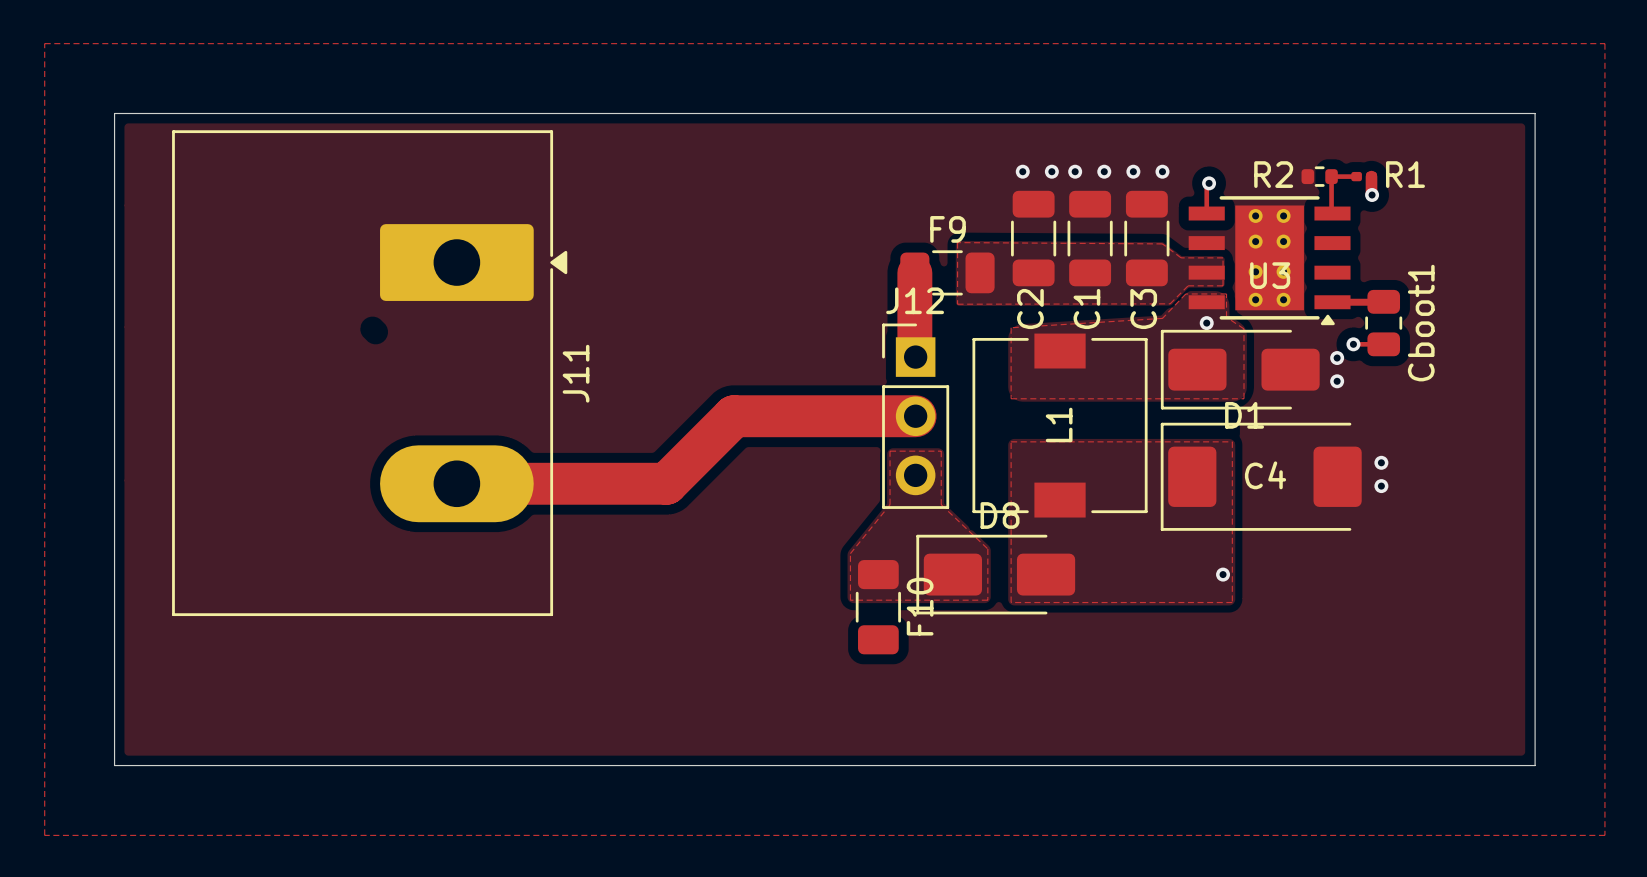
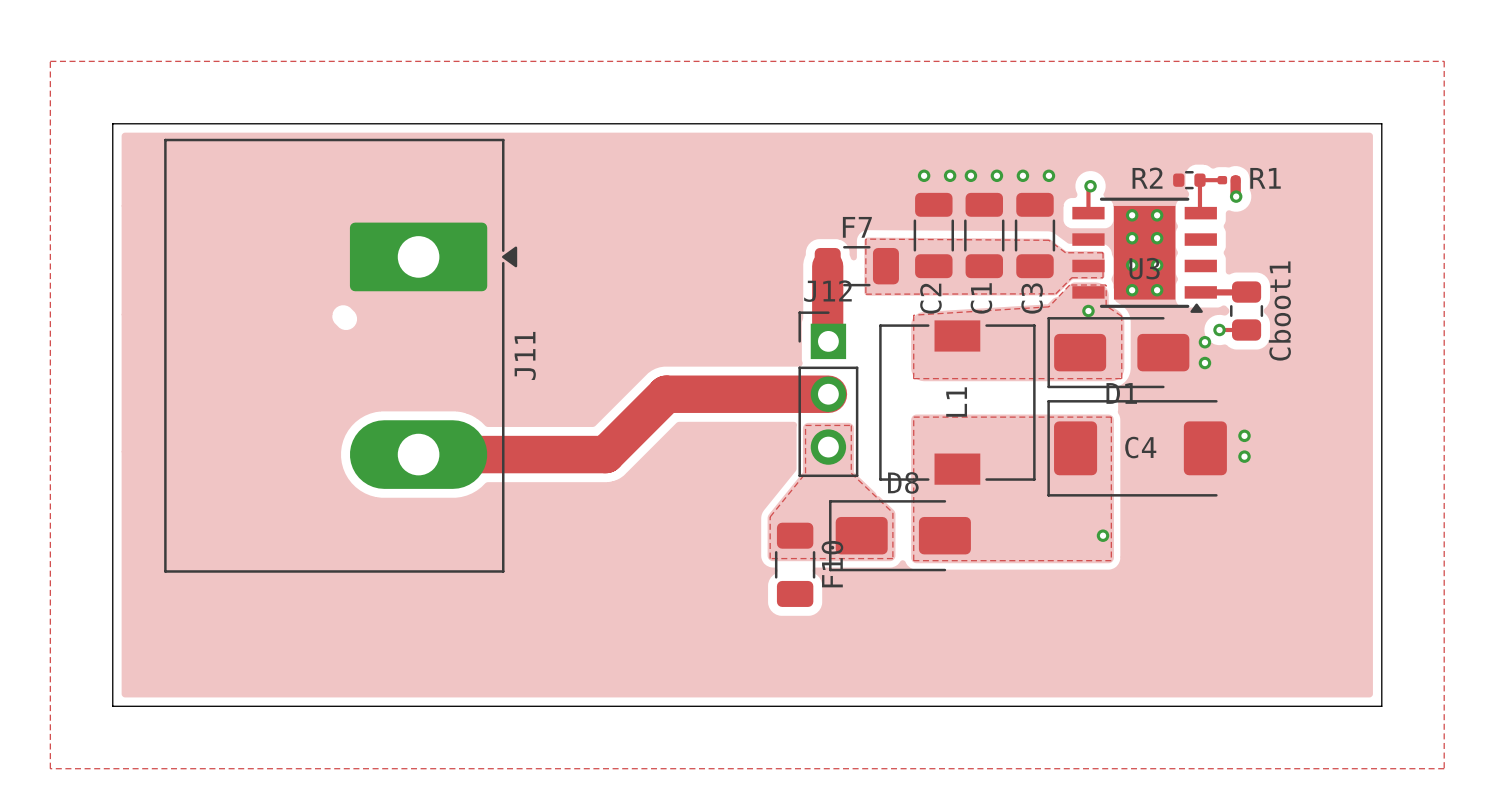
F9 name: F9 (948, 229) -> F7 (857, 227)

